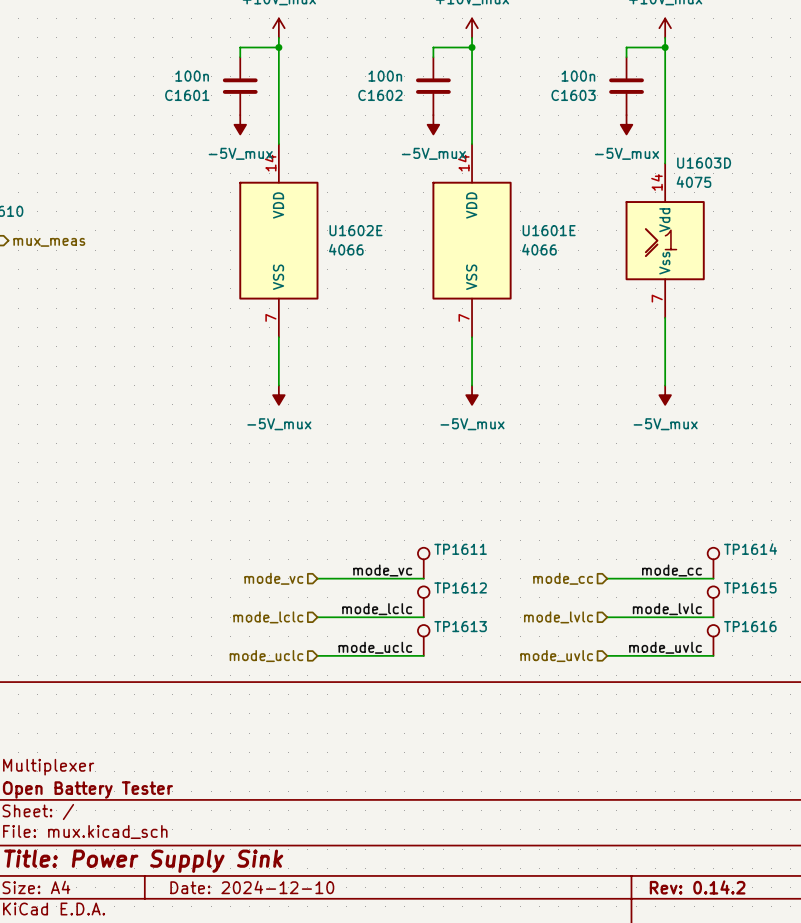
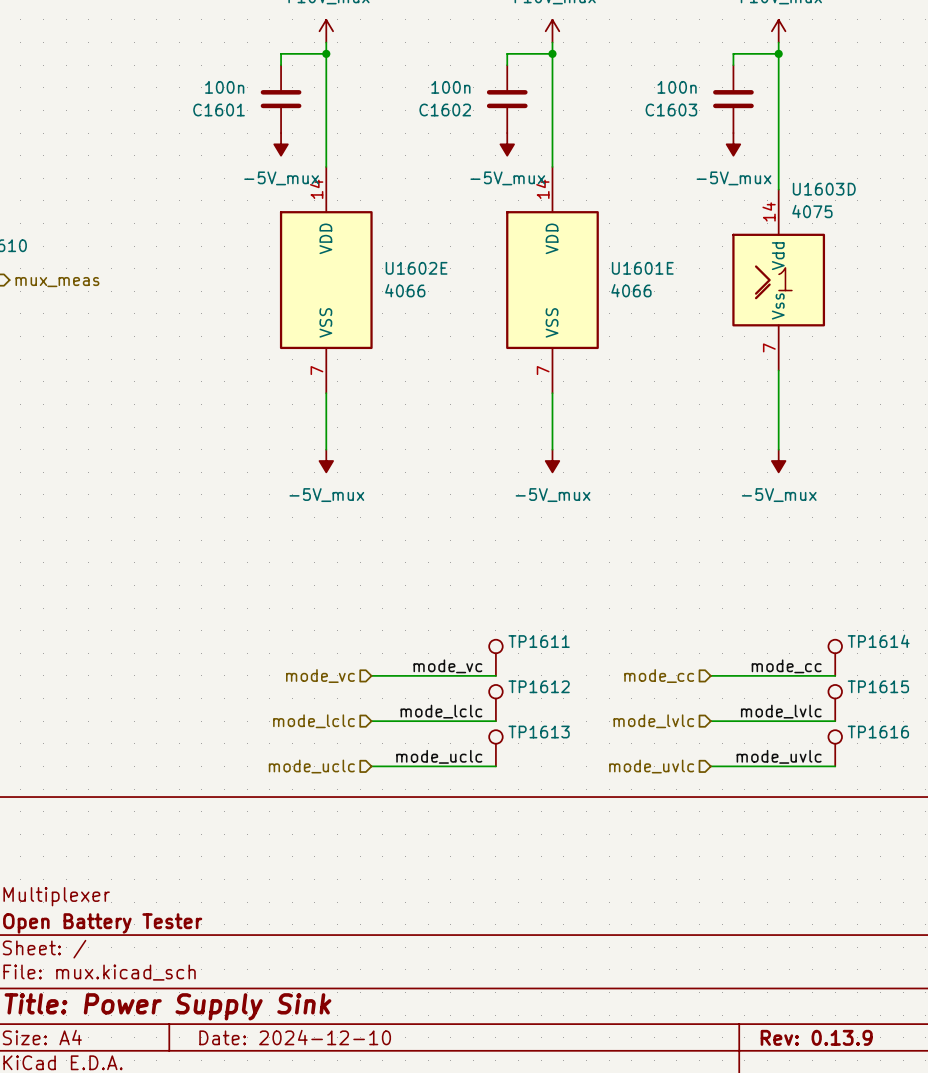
title block: Rev: 0.14.2 (697, 887) -> Rev: 0.13.9 (816, 1037)

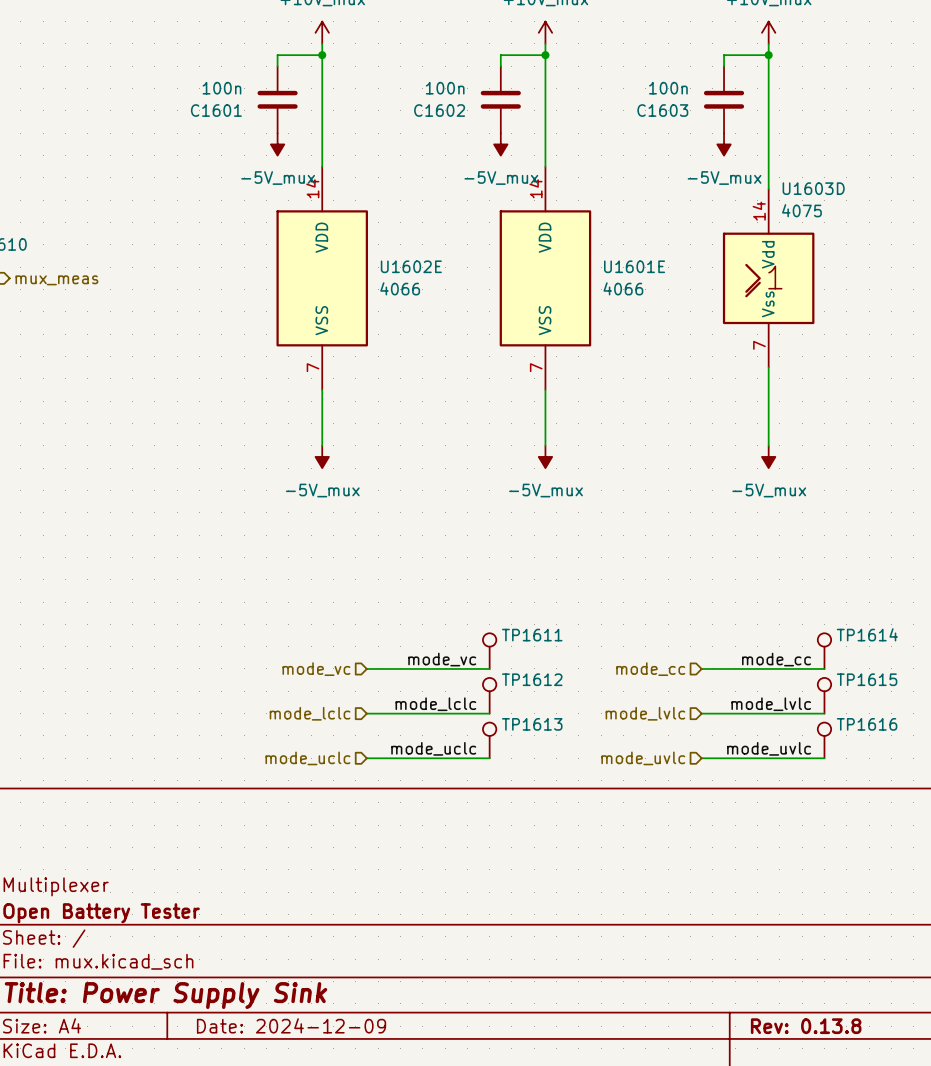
title block: Date: 2024-12-10 (295, 1037) -> Date: 2024-12-09 (291, 1025)
title block: Rev: 0.13.9 (816, 1037) -> Rev: 0.13.8 (806, 1026)

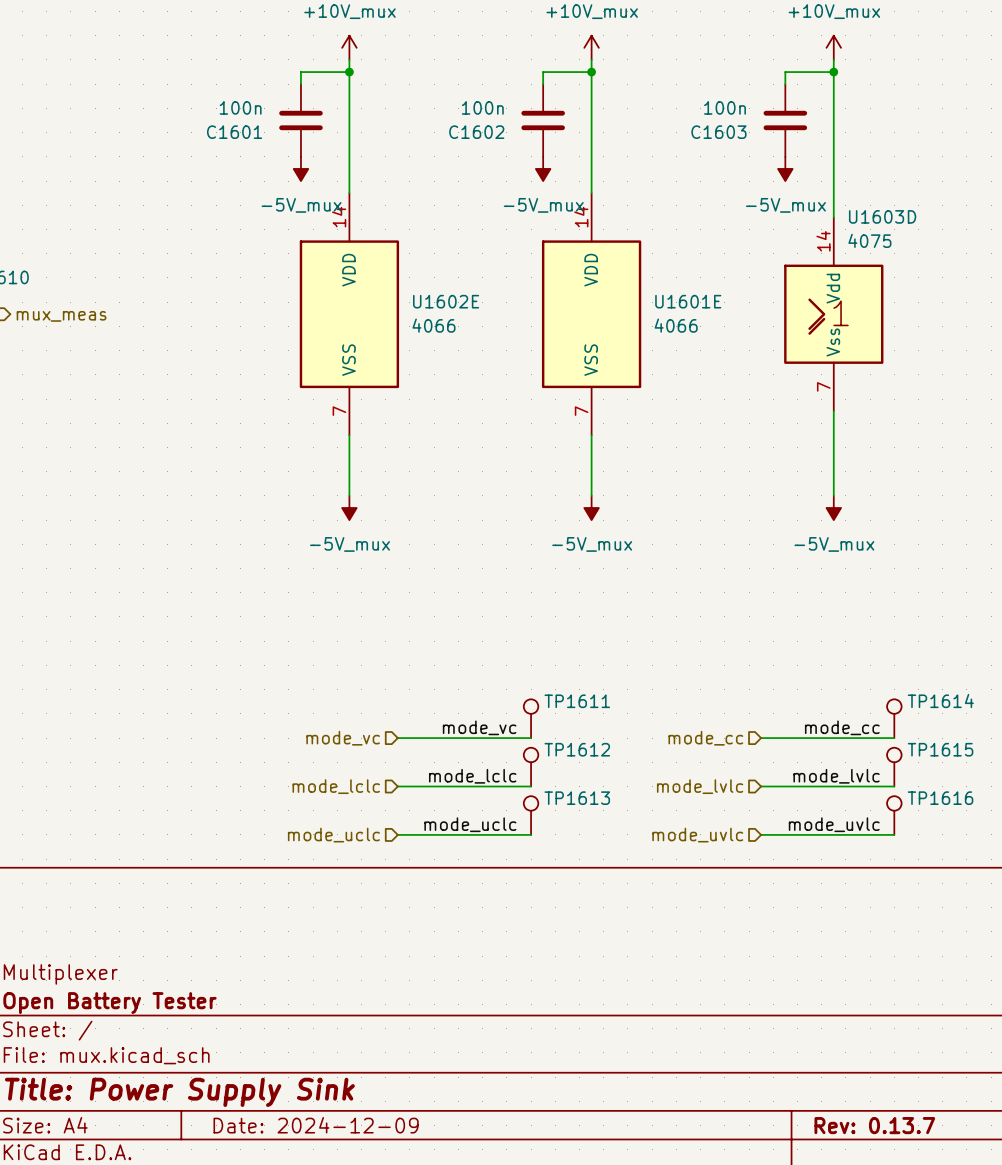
title block: Rev: 0.13.8 (806, 1026) -> Rev: 0.13.7 (874, 1125)

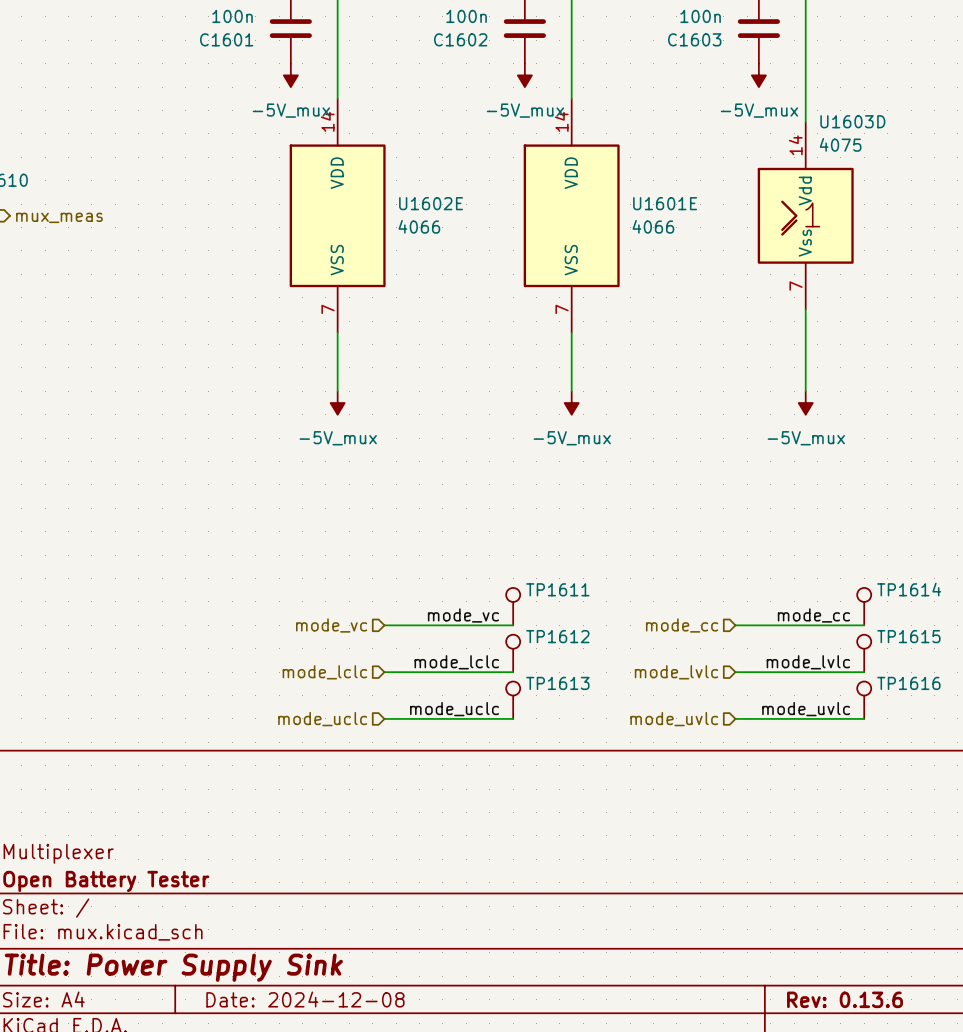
title block: Date: 2024-12-09 (316, 1125) -> Date: 2024-12-08 (305, 999)
title block: Rev: 0.13.7 (874, 1125) -> Rev: 0.13.6 (845, 999)

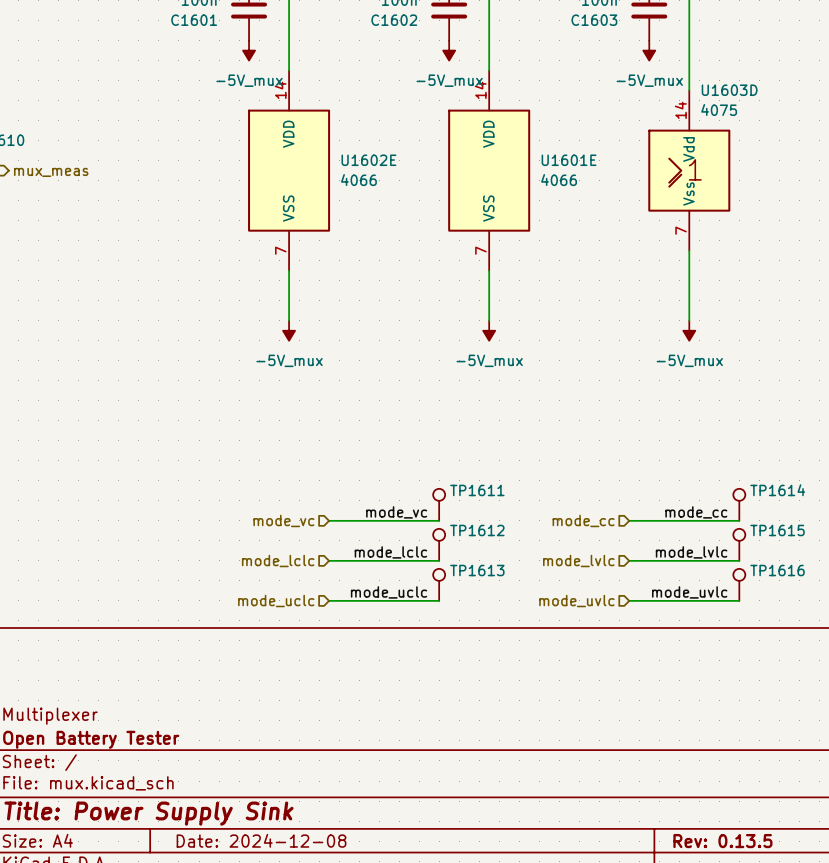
title block: Rev: 0.13.6 (845, 999) -> Rev: 0.13.5 (722, 841)

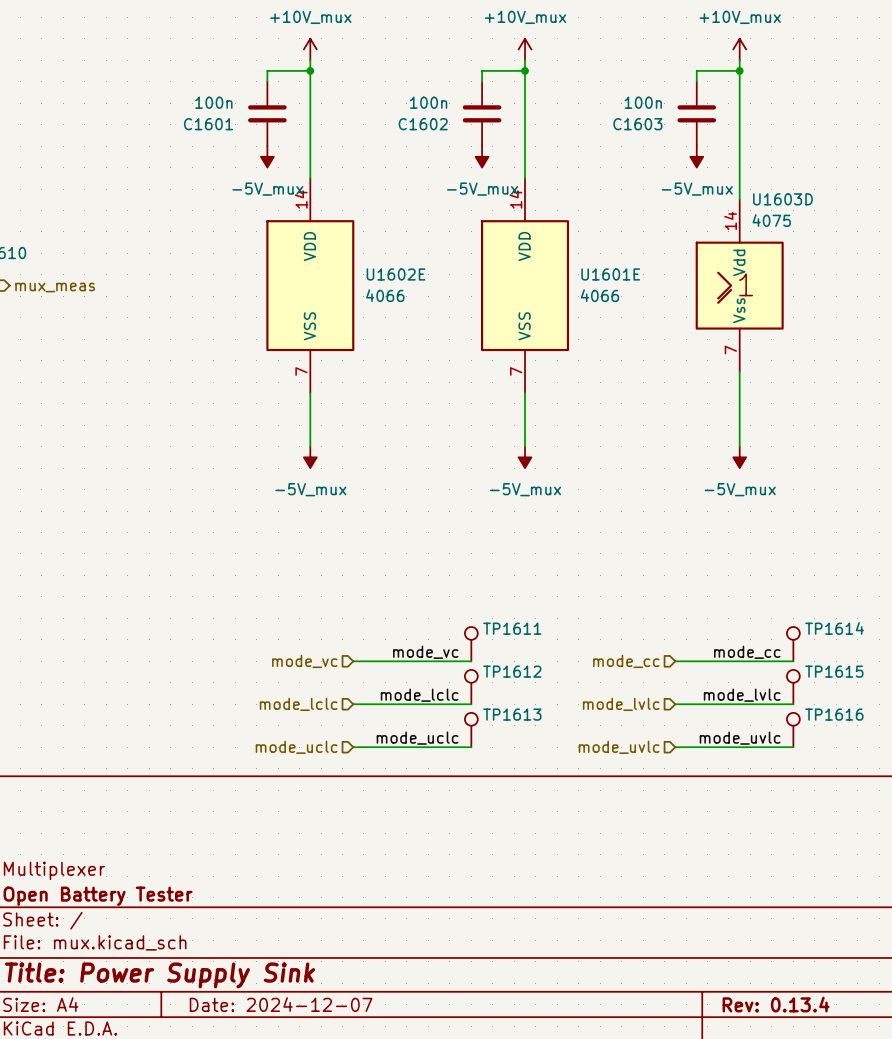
title block: Date: 2024-12-08 (261, 840) -> Date: 2024-12-07 (281, 1004)
title block: Rev: 0.13.5 (722, 841) -> Rev: 0.13.4 (776, 1004)

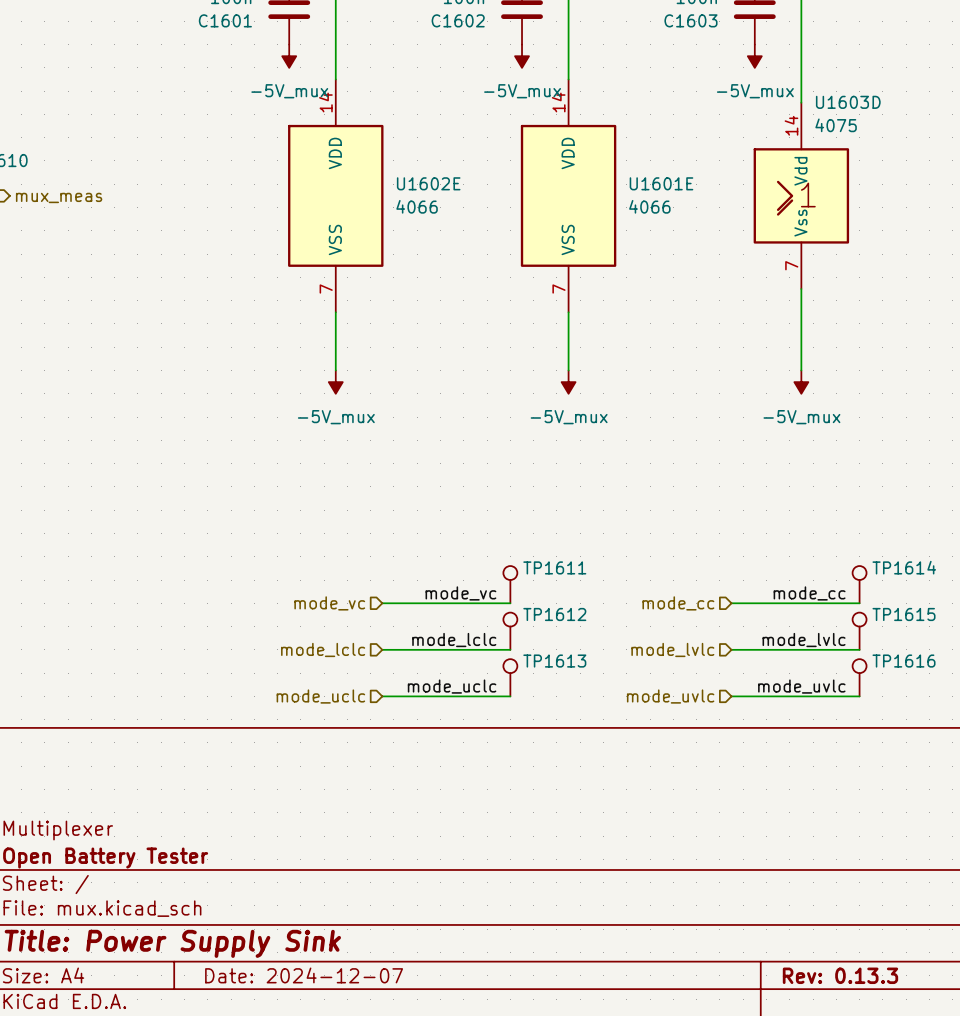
title block: Rev: 0.13.4 (776, 1004) -> Rev: 0.13.3 (840, 975)

